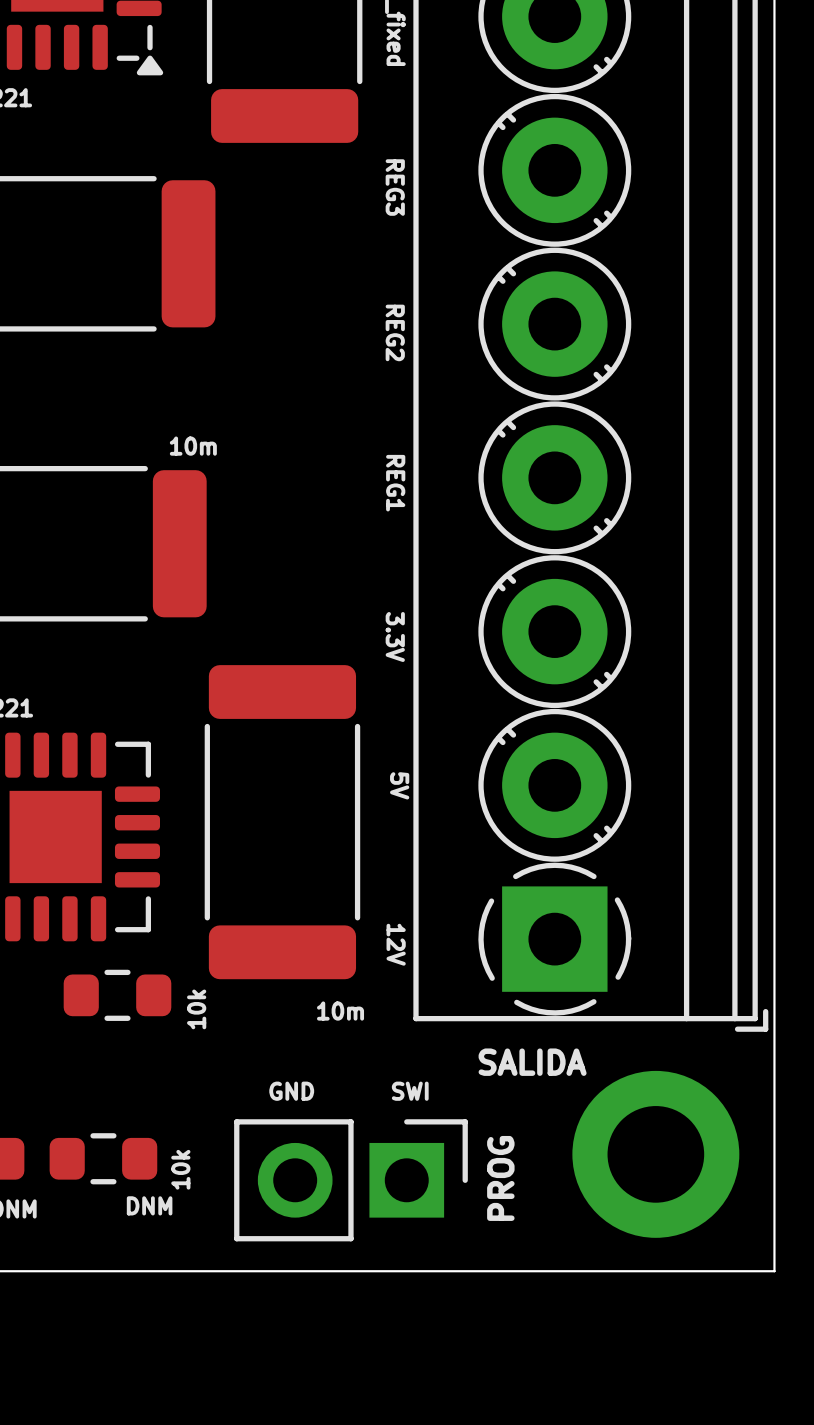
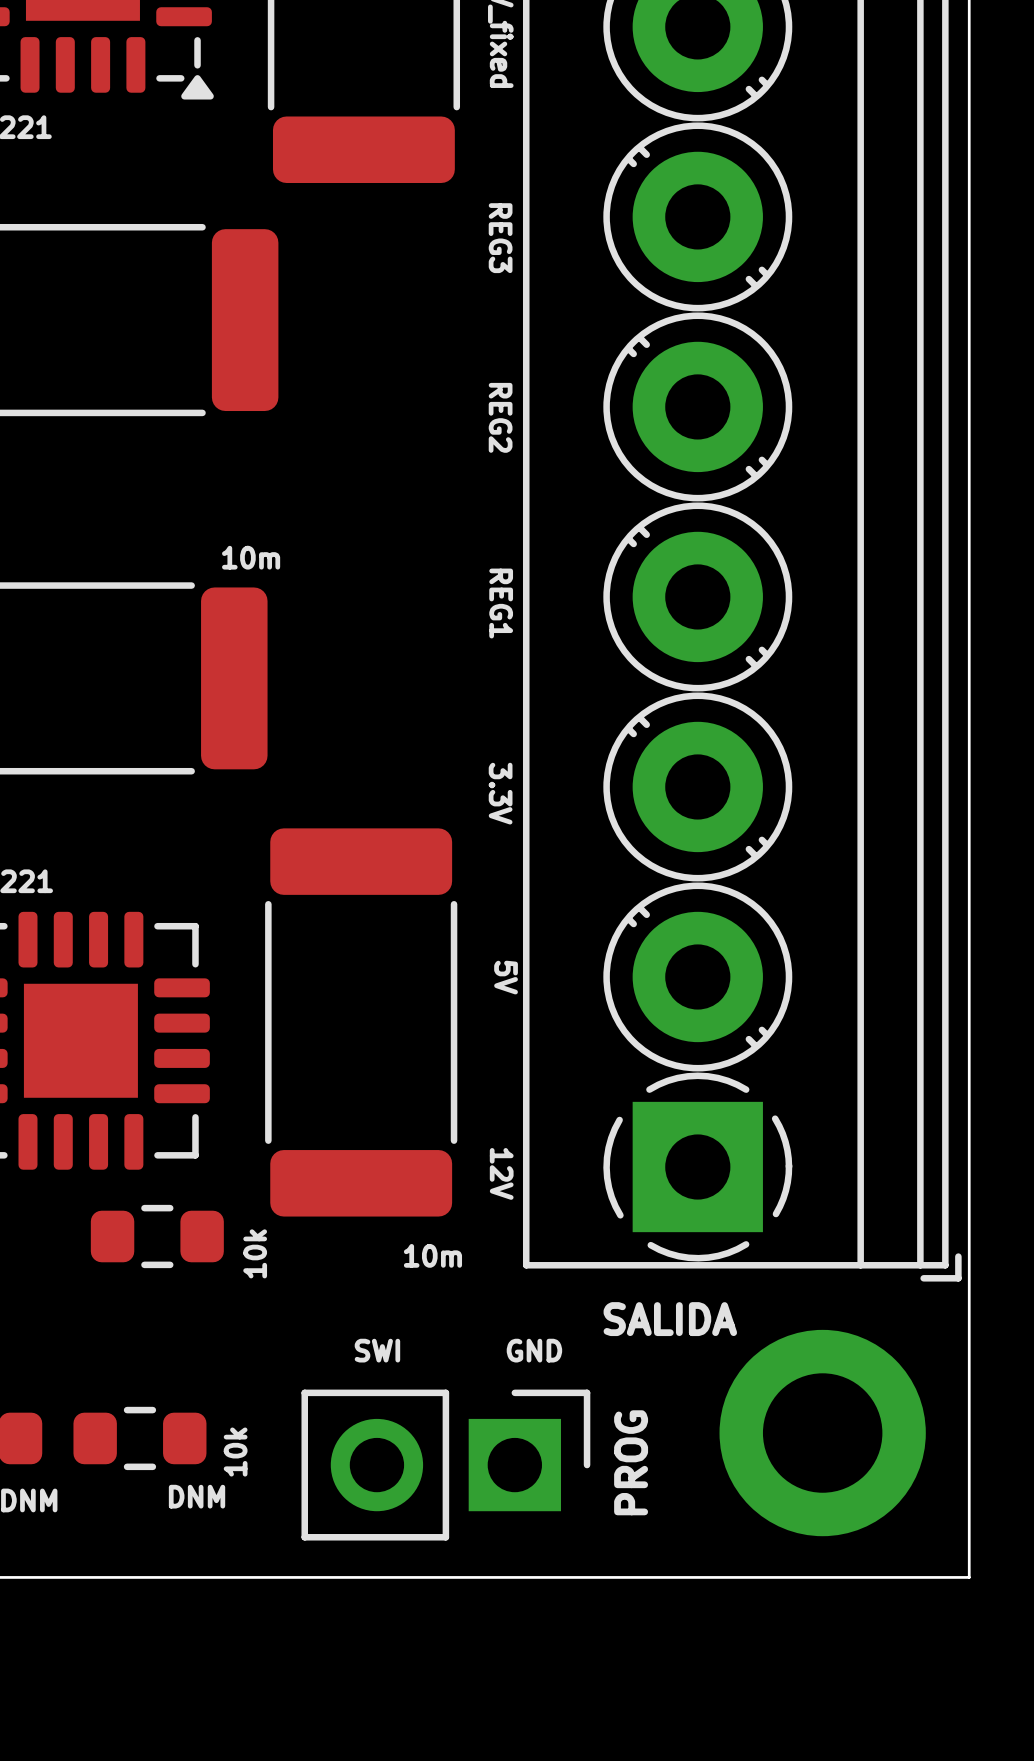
text: GND (291, 1091) -> SWI (377, 1350)
text: SWI (410, 1091) -> GND (534, 1350)

